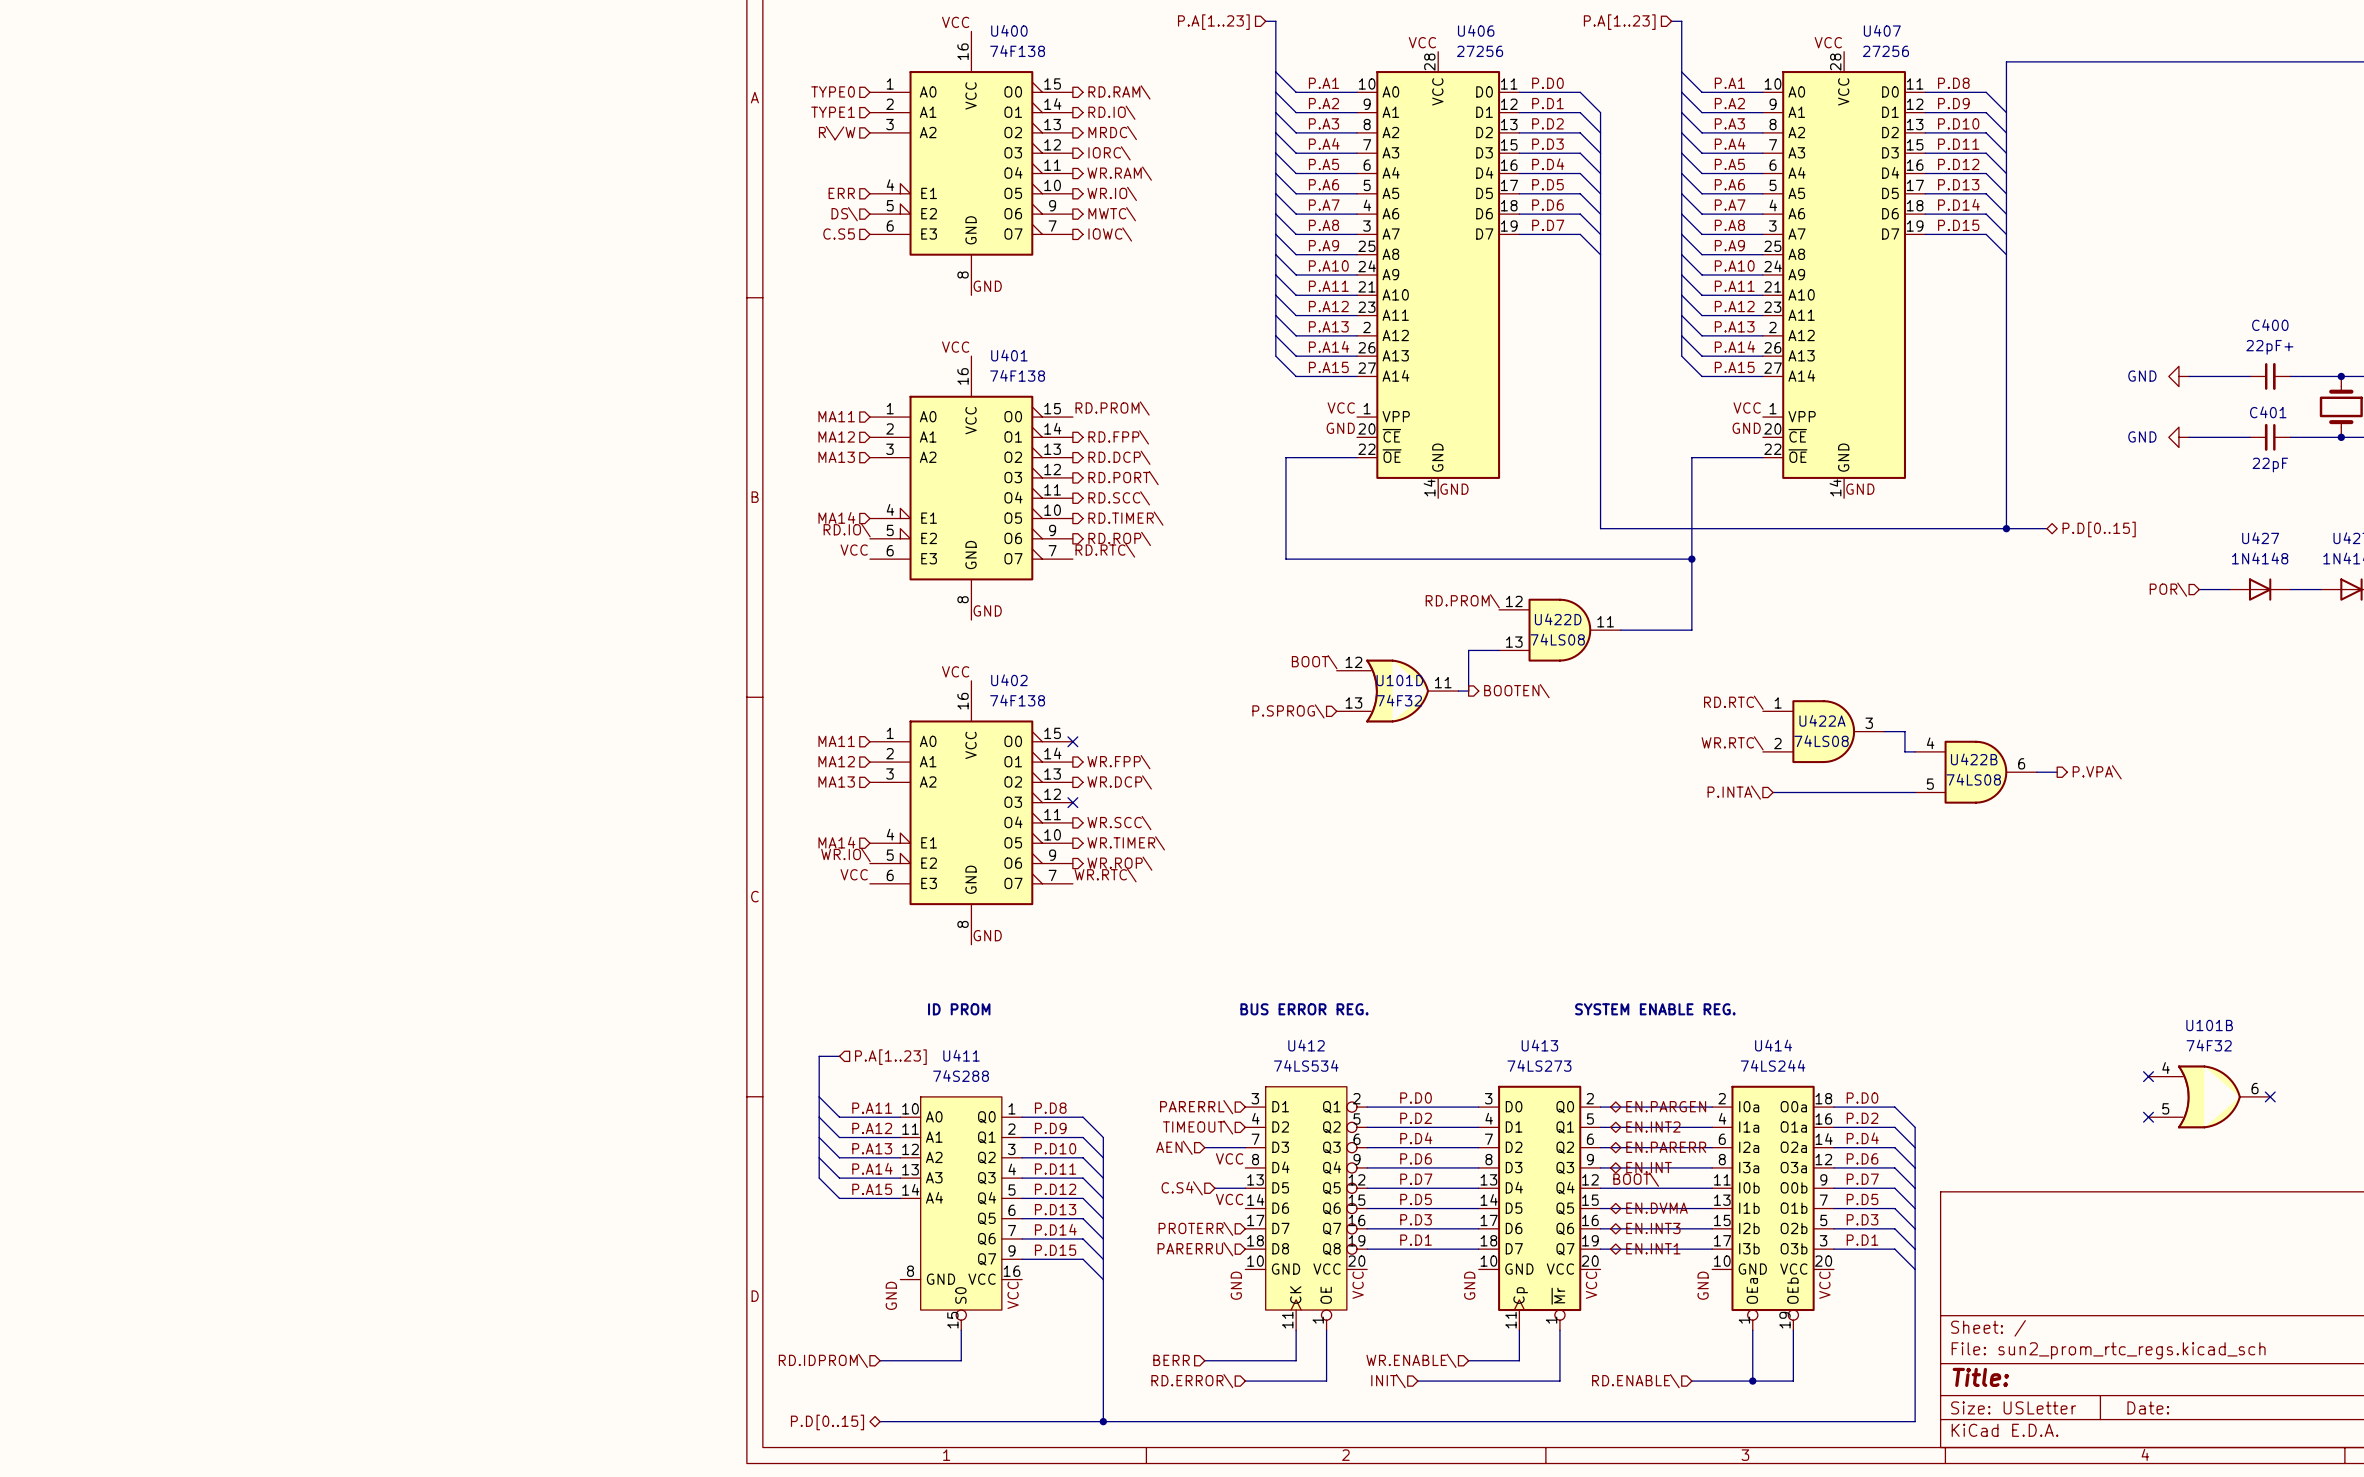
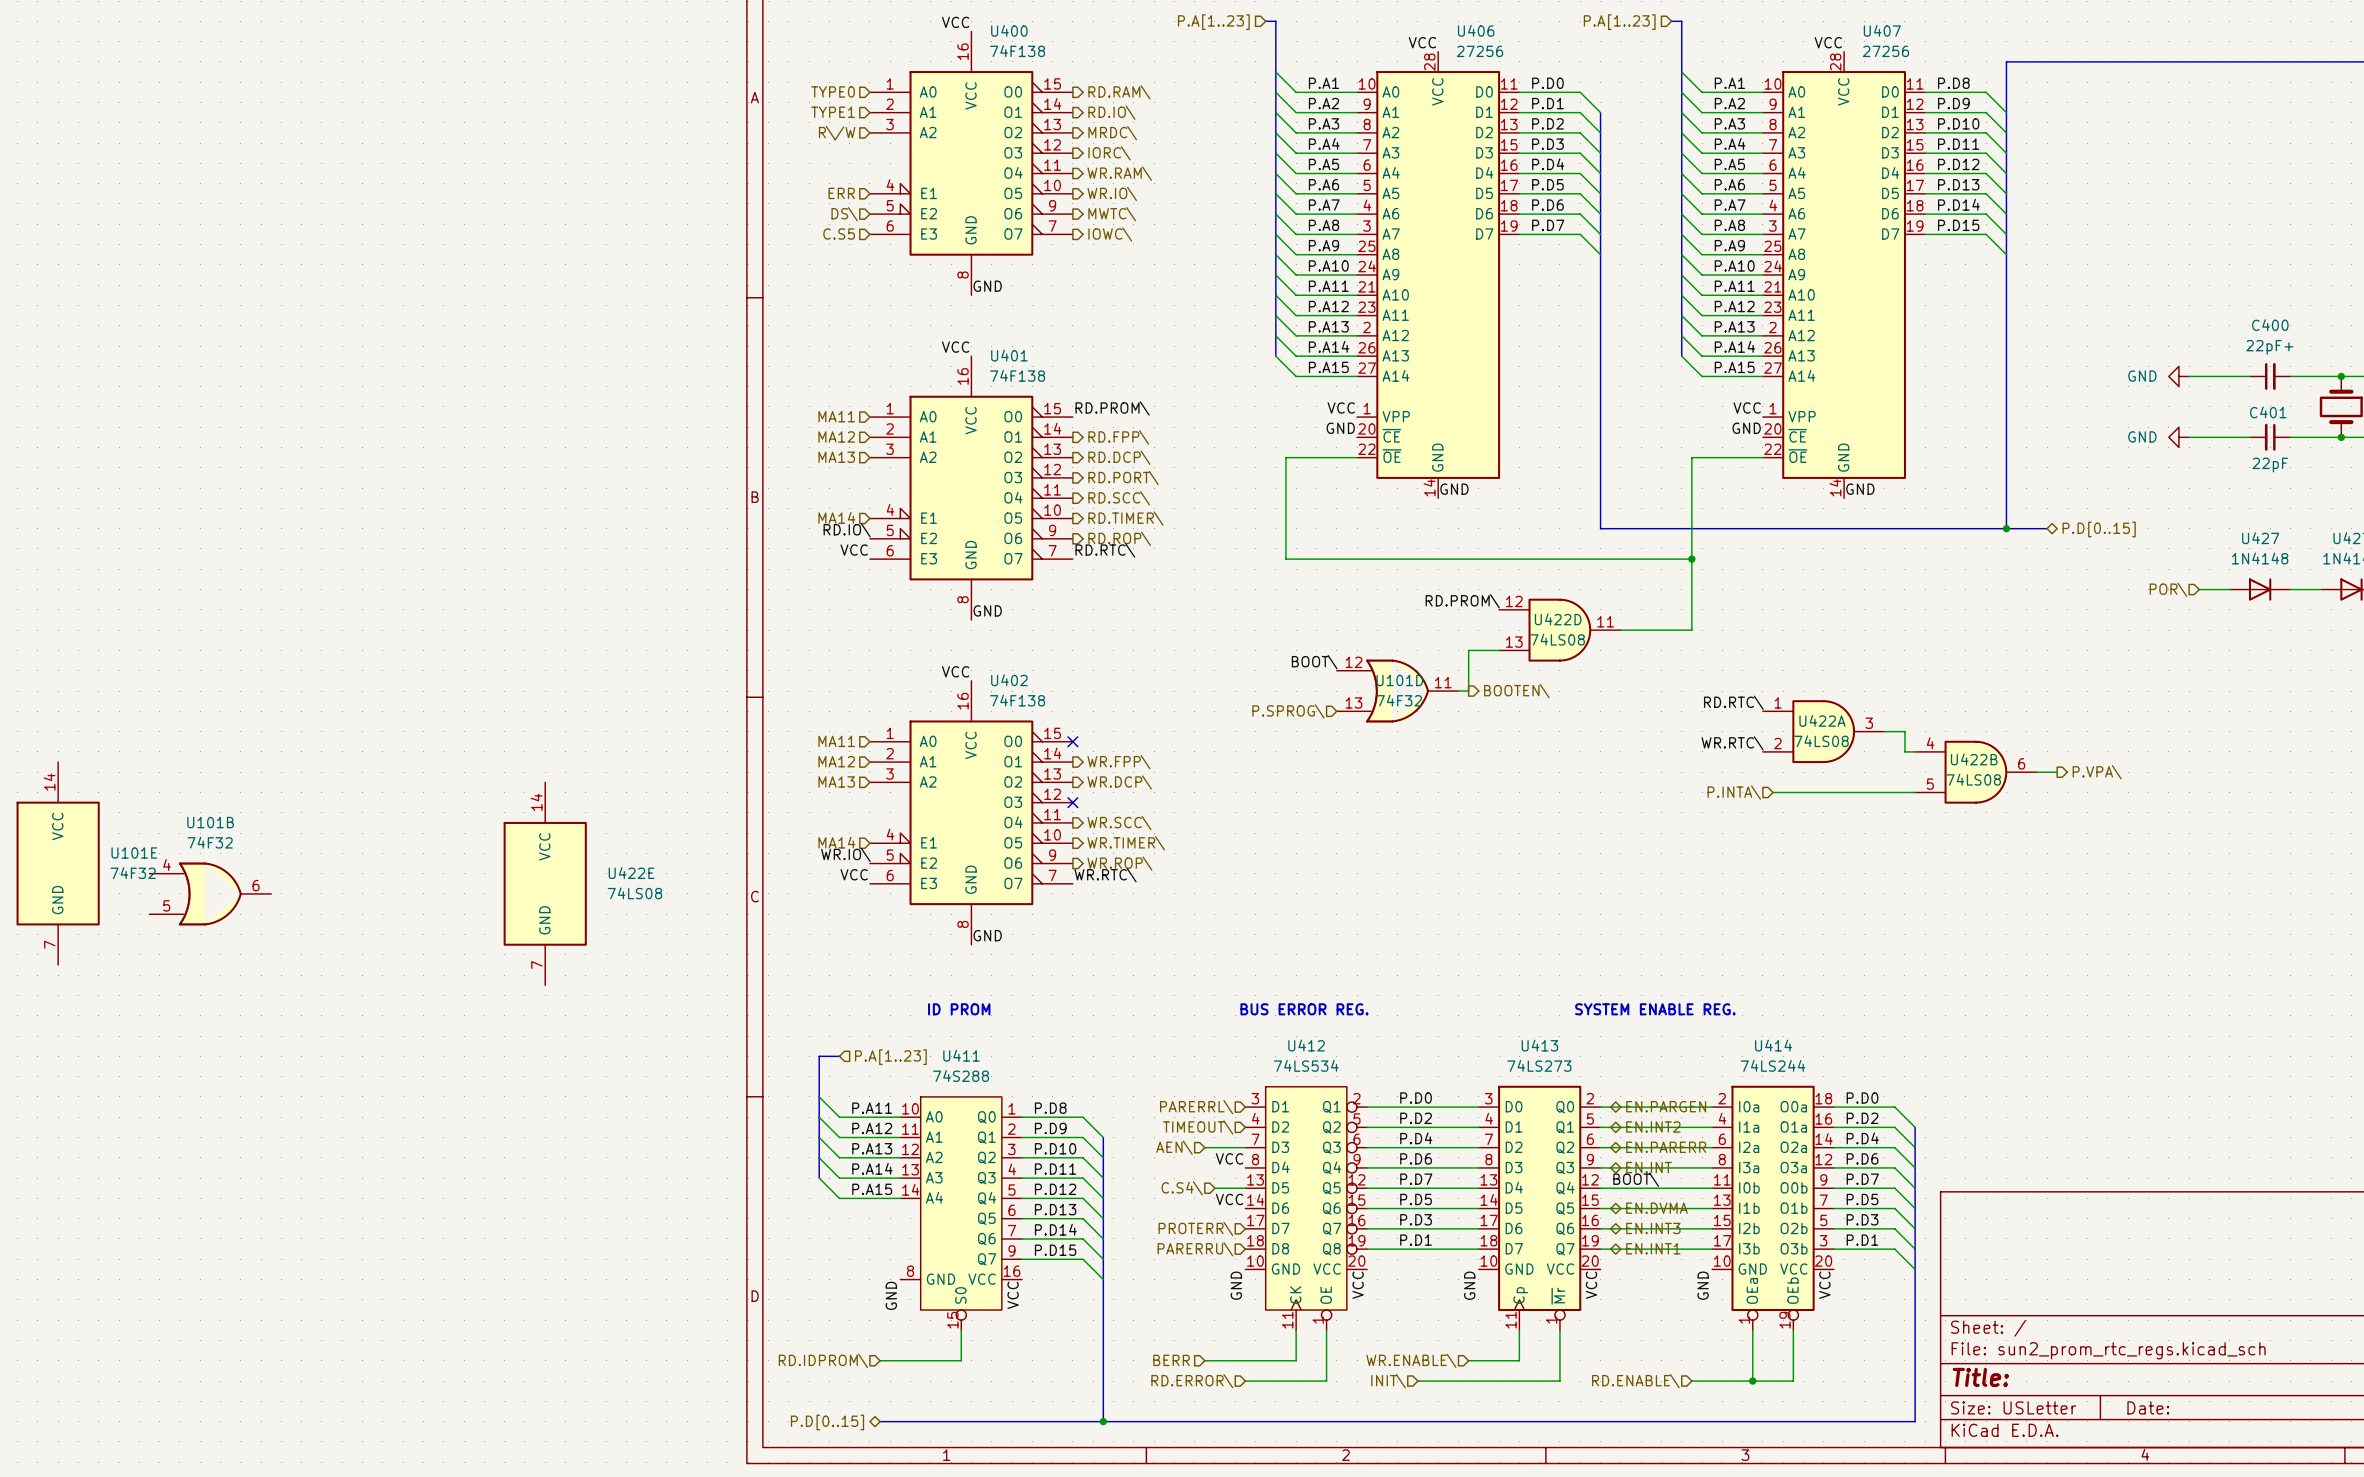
U101E: none -> 74F32 (58, 863)
U422E: none -> 74LS08 (545, 883)
no-connect mark: (2148, 1076) -> none
U101B position: (2209, 1096) -> (210, 893)
no-connect mark: (2270, 1096) -> none
no-connect mark: (2148, 1117) -> none

